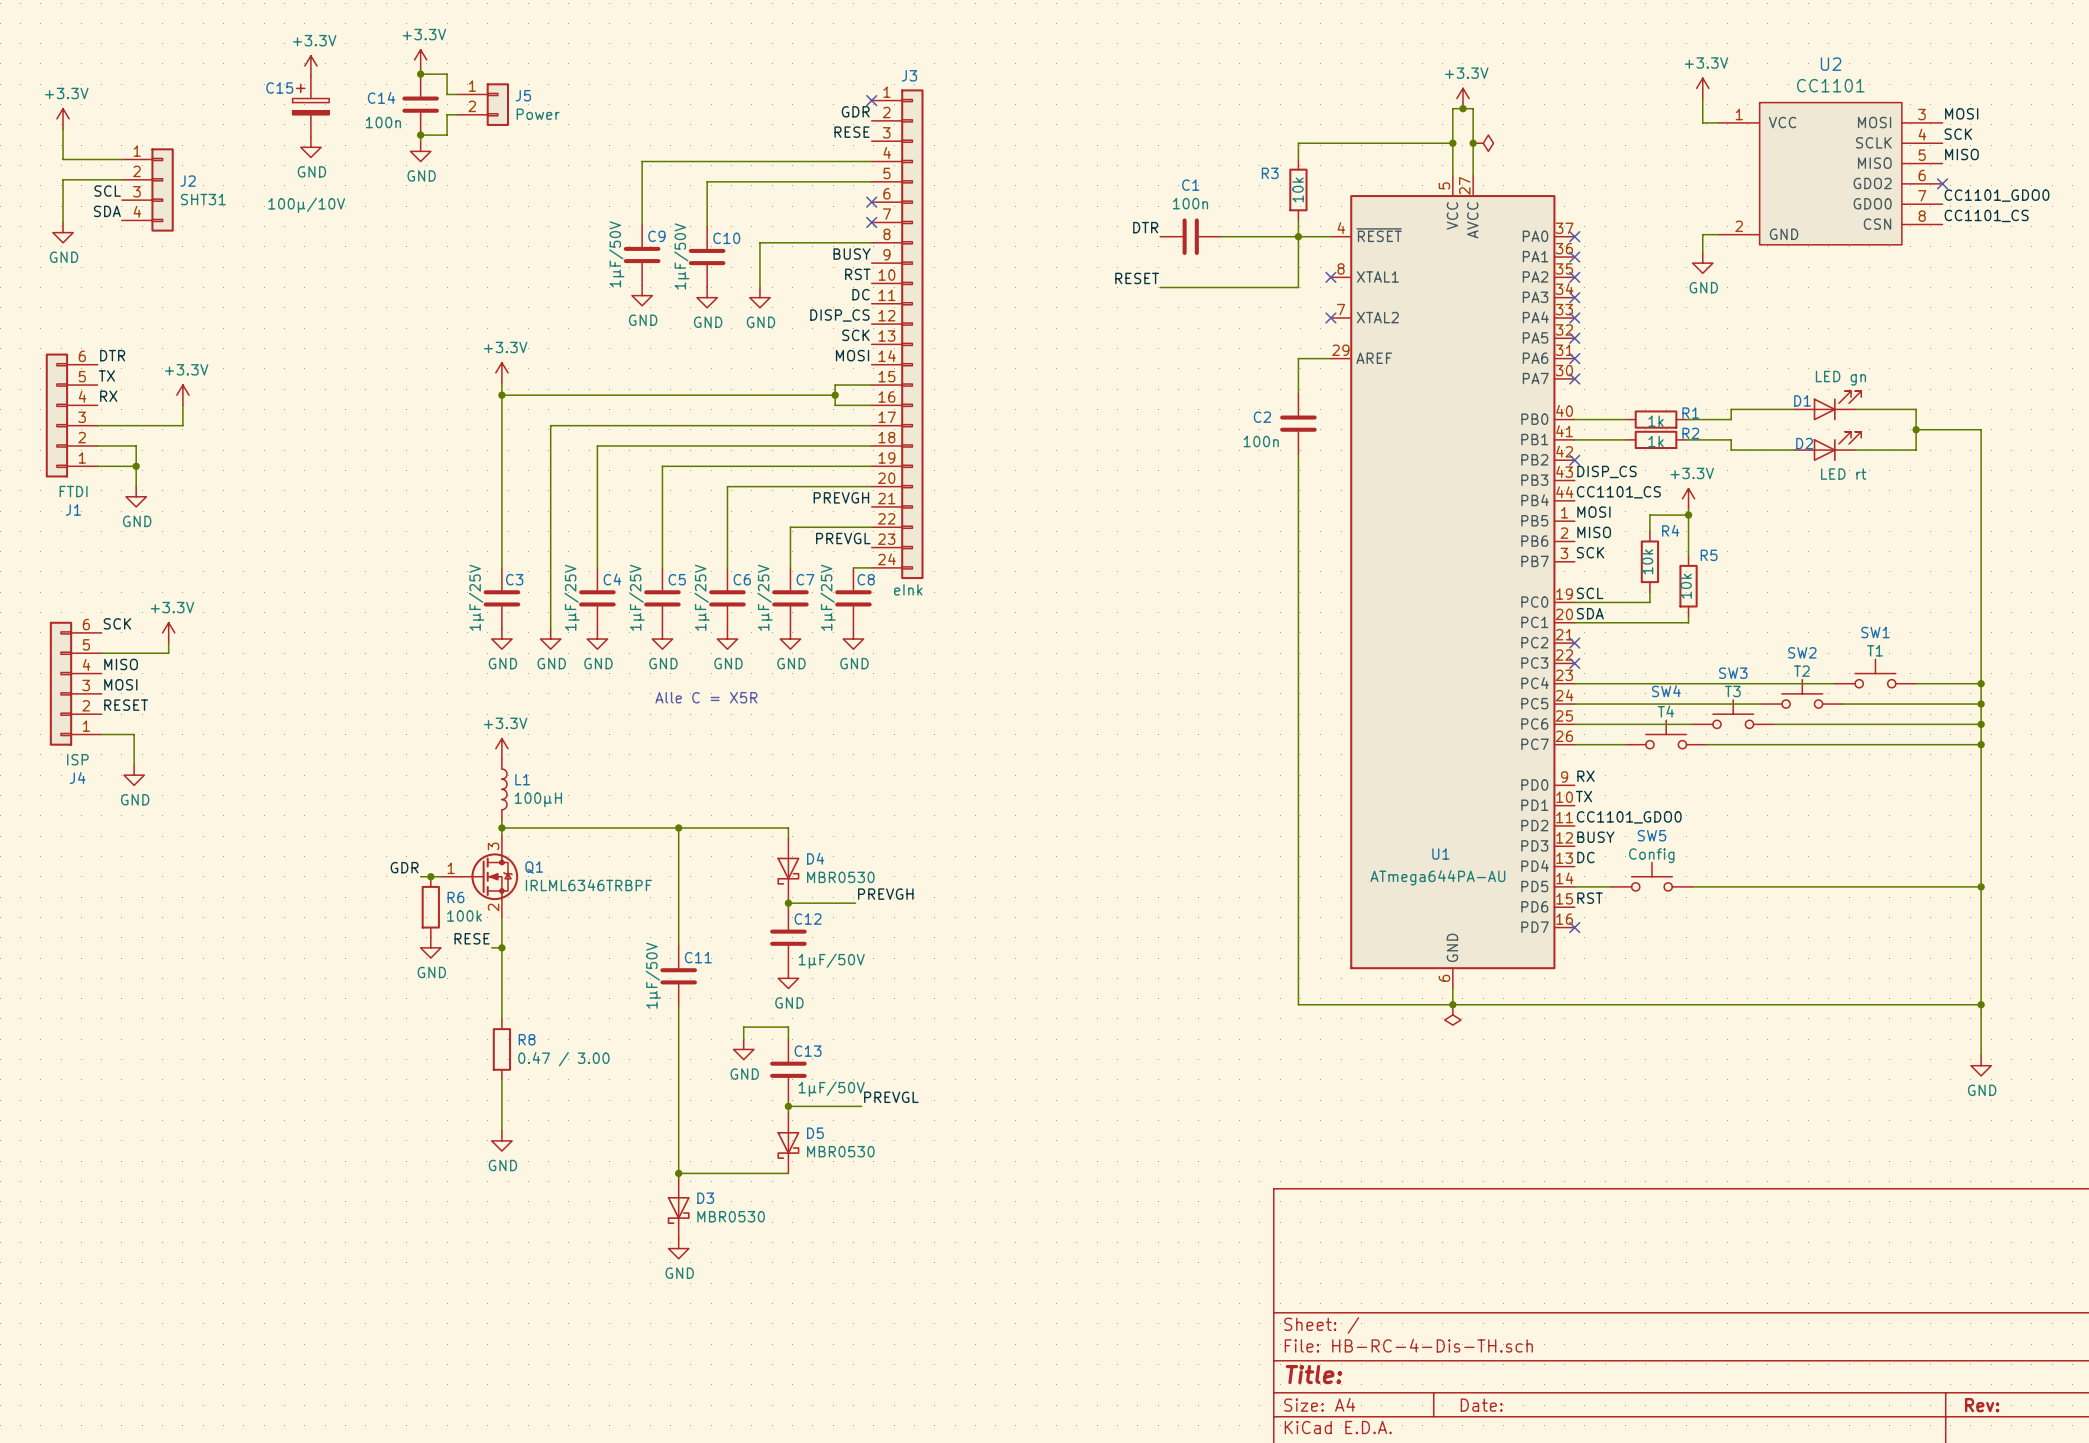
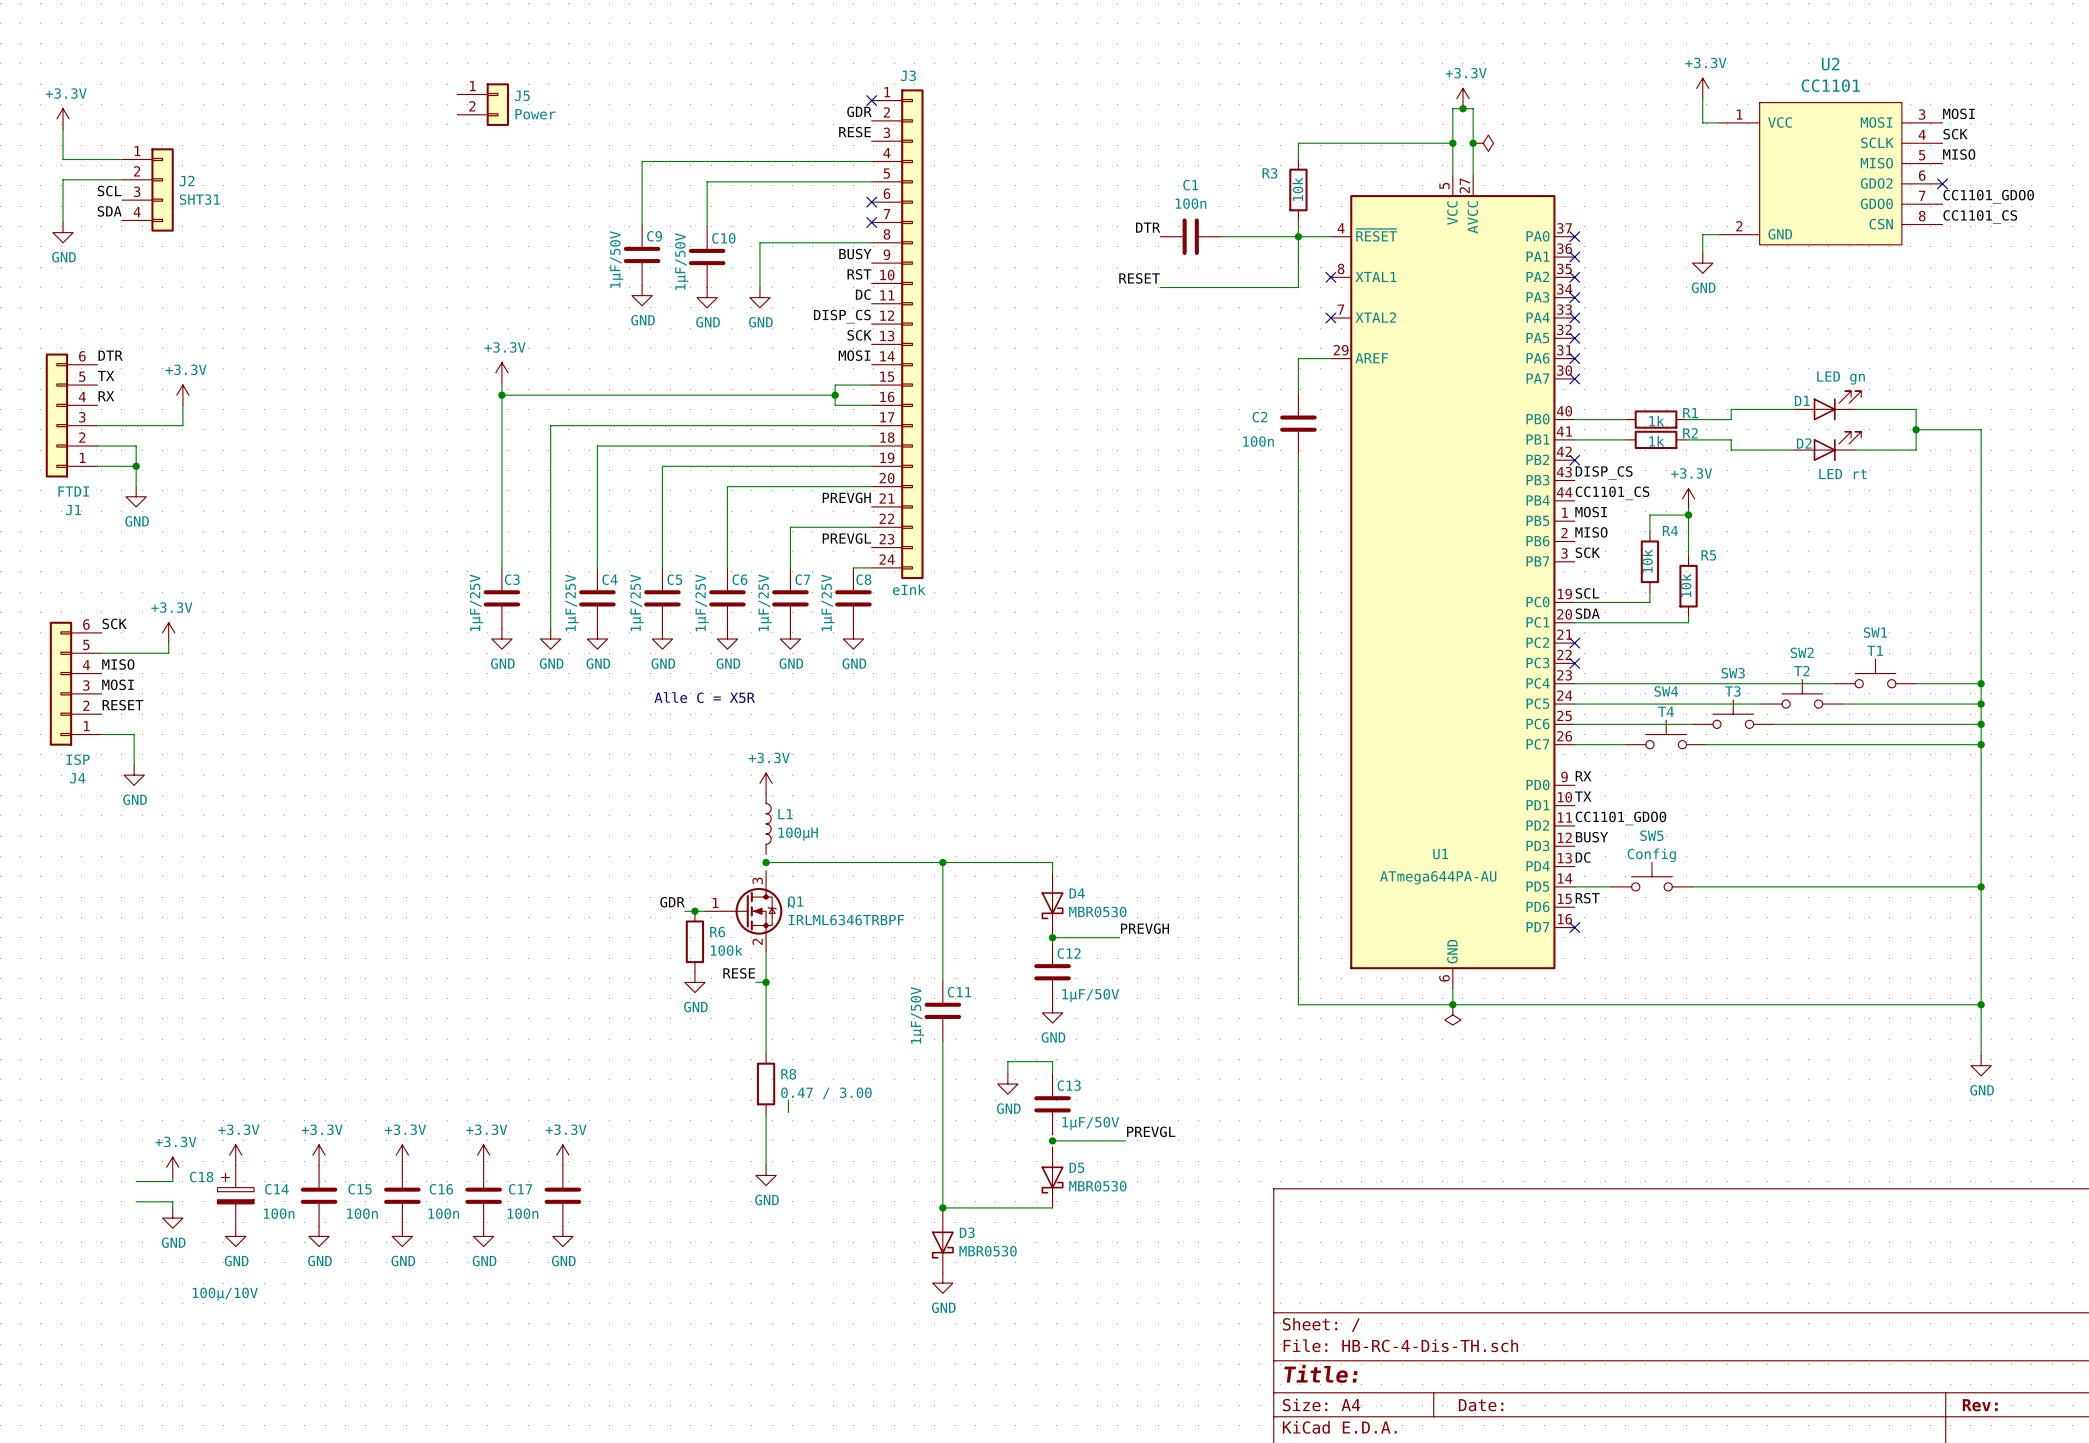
power symbol: +3.3V (420, 59) -> none
power symbol: +3.3V (310, 66) -> none
wire: (420, 70) (420, 74) (447, 74) (447, 94) (457, 94) -> none
junction: (420, 74) -> none
C15 symbol: [292, 76, 330, 138] -> [384, 1165, 421, 1227]
C14 position: (420, 104) -> (319, 1195)
wire: (457, 114) (447, 114) (447, 135) (420, 135) (420, 141) -> none
junction: (420, 135) -> none
power symbol: GND (310, 147) -> none
power symbol: GND (420, 151) -> none
C15 value: 100µ/10V (306, 205) -> 100n (362, 1213)
power symbol: +3.3V (501, 748) -> none
power symbol: none -> +3.3V (766, 783)
L1 position: (504, 789) -> (768, 823)
wire: (501, 819) (501, 836) -> none
wire: (501, 827) (788, 827) (788, 838) -> none
junction: (501, 827) -> none
wire: (678, 827) (678, 945) -> none
junction: (678, 827) -> none
wire: none -> (766, 862) (1052, 862) (1052, 872)
junction: none -> (766, 862)
wire: none -> (942, 862) (942, 980)
junction: none -> (942, 862)
label: GDR (404, 867) -> none
D4 position: (788, 868) -> (1052, 903)
wire: (420, 876) (440, 876) -> none
junction: (430, 876) -> none
Q1 position: (479, 876) -> (743, 911)
label: PREVGH (885, 894) -> none
label: none -> GDR (672, 902)
wire: (788, 903) (855, 903) -> none
junction: (788, 903) -> none
R6 position: (430, 907) -> (694, 941)
wire: none -> (684, 911) (705, 911)
junction: none -> (694, 911)
wire: (501, 917) (501, 1018) -> none
label: none -> PREVGH (1144, 928)
C12 position: (788, 937) -> (1052, 972)
wire: none -> (1052, 937) (1119, 937)
junction: none -> (1052, 937)
label: RESE (472, 938) -> none
power symbol: GND (430, 947) -> none
wire: (491, 947) (501, 947) -> none
junction: (501, 947) -> none
wire: none -> (766, 951) (766, 1053)
label: none -> RESE (739, 973)
C11 position: (678, 976) -> (942, 1010)
power symbol: GND (788, 978) -> none
power symbol: none -> GND (694, 982)
wire: none -> (755, 982) (766, 982)
junction: none -> (766, 982)
wire: (678, 1006) (678, 1177) -> none
power symbol: none -> GND (1052, 1012)
wire: (743, 1039) (743, 1027) (788, 1027) (788, 1039) -> none
wire: none -> (942, 1041) (942, 1212)
R8 position: (501, 1049) -> (766, 1084)
power symbol: GND (743, 1049) -> none
C13 position: (788, 1069) -> (1052, 1104)
wire: none -> (1007, 1073) (1007, 1061) (1052, 1061) (1052, 1073)
wire: (501, 1079) (501, 1130) -> none
power symbol: none -> GND (1007, 1084)
label: PREVGL (891, 1097) -> none
wire: (788, 1106) (861, 1106) -> none
junction: (788, 1106) -> none
wire: none -> (766, 1114) (766, 1165)
label: none -> PREVGL (1151, 1131)
power symbol: GND (501, 1140) -> none
wire: none -> (1052, 1140) (1125, 1140)
junction: none -> (1052, 1140)
D5 position: (788, 1142) -> (1052, 1177)
power symbol: none -> +3.3V (235, 1155)
power symbol: none -> +3.3V (319, 1155)
power symbol: none -> +3.3V (402, 1155)
power symbol: none -> +3.3V (483, 1155)
power symbol: none -> +3.3V (562, 1155)
power symbol: none -> +3.3V (172, 1167)
wire: (678, 1173) (788, 1173) -> none
junction: (678, 1173) -> none
power symbol: none -> GND (766, 1175)
wire: none -> (172, 1177) (172, 1181) (136, 1181)
C18: none -> 100µ/10V (235, 1195)
C16: none -> 100n (483, 1195)
C17: none -> 100n (562, 1195)
wire: none -> (136, 1201) (172, 1201) (172, 1207)
D3 position: (678, 1207) -> (942, 1242)
wire: none -> (942, 1207) (1052, 1207)
junction: none -> (942, 1207)
power symbol: none -> GND (172, 1218)
power symbol: none -> GND (235, 1236)
power symbol: none -> GND (319, 1236)
power symbol: none -> GND (402, 1236)
power symbol: none -> GND (483, 1236)
power symbol: none -> GND (562, 1236)
power symbol: GND (678, 1248) -> none
power symbol: none -> GND (942, 1283)

